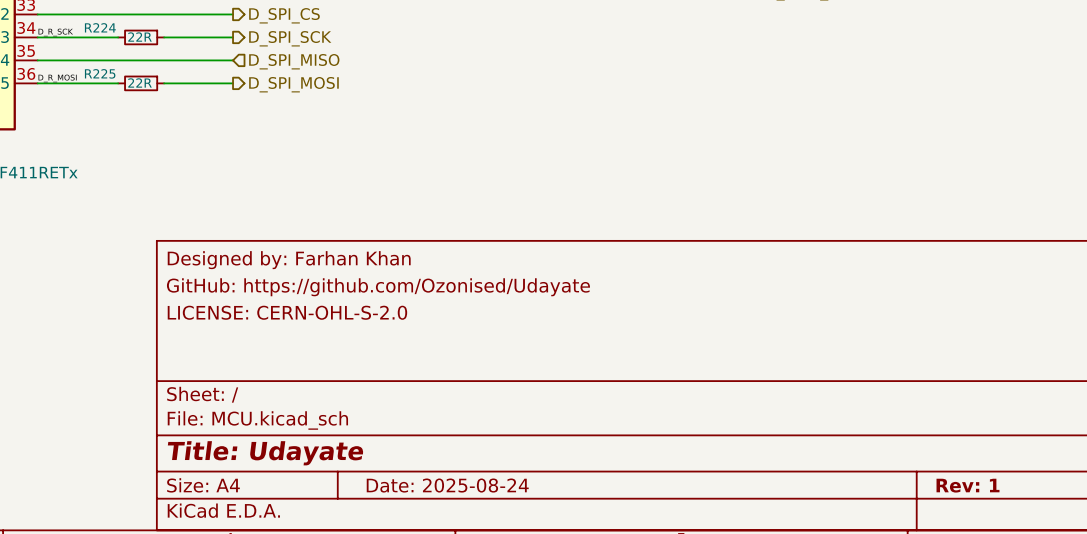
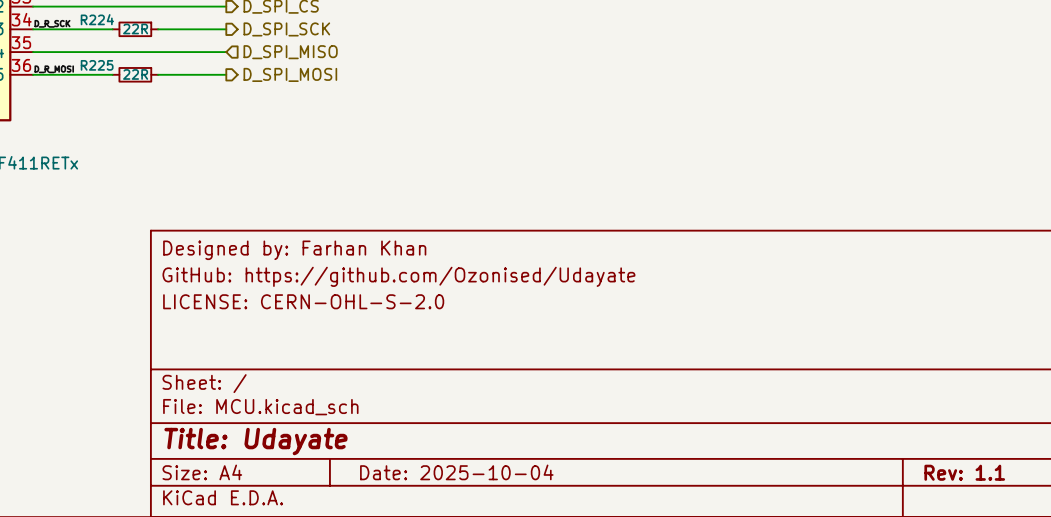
title block: Date: 2025-08-24 (447, 485) -> Date: 2025-10-04 (456, 472)
title block: Rev: 1 (968, 485) -> Rev: 1.1 (964, 472)

